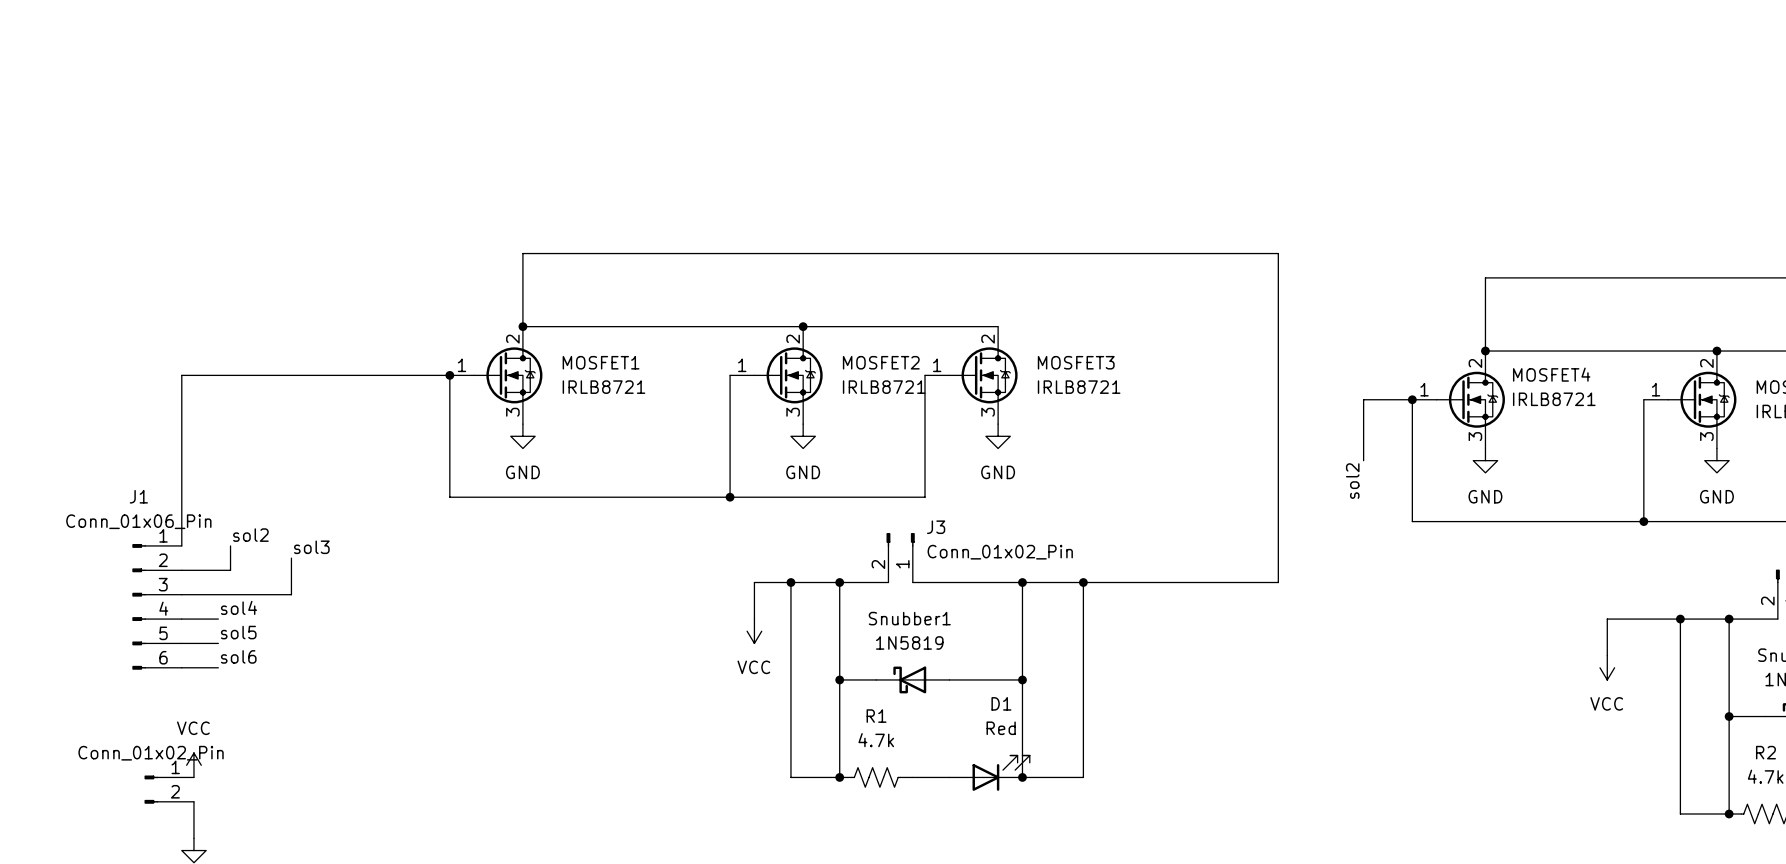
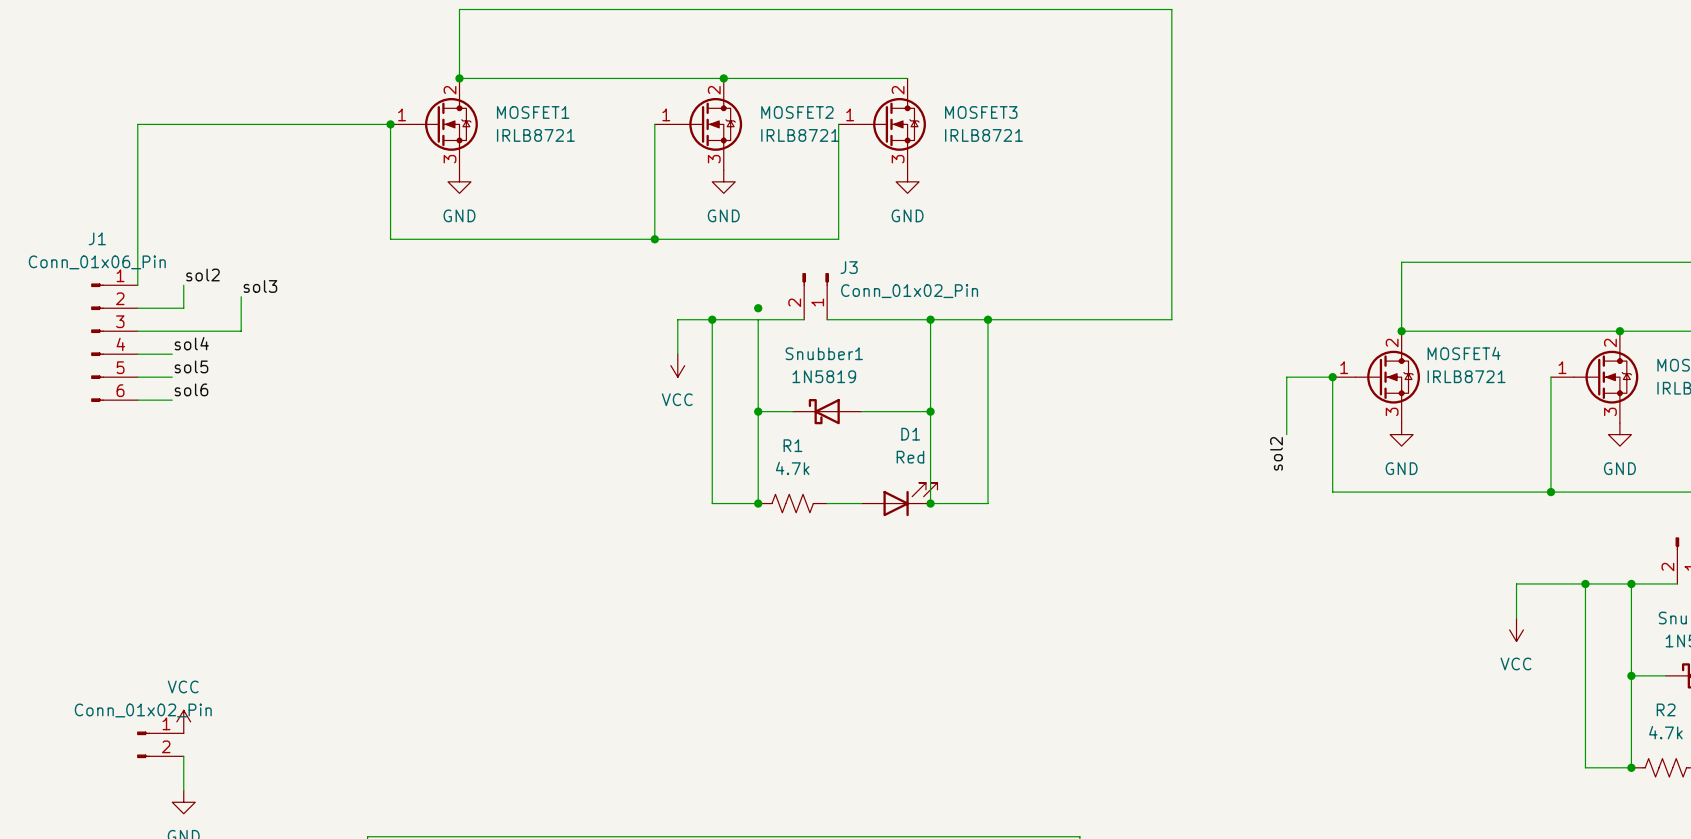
junction: none -> (459, 78)
junction: none -> (723, 78)
wire: none -> (907, 78) (459, 78) (459, 9) (1171, 9) (1171, 319) (827, 319)
junction: none -> (390, 124)
wire: none -> (654, 124) (654, 239)
power symbol: none -> GND (459, 181)
power symbol: none -> GND (723, 181)
power symbol: none -> GND (907, 181)
wire: (522, 253) (522, 326) (998, 326) -> (493, 239) (390, 239) (390, 124) (137, 124) (137, 285)
junction: none -> (654, 239)
wire: (888, 253) (1278, 253) (1278, 582) (912, 582) -> (838, 239) (838, 124)
label: none -> sol2 (202, 275)
wire: none -> (183, 285) (183, 308) (137, 308)
label: none -> sol3 (260, 286)
wire: none -> (241, 296) (241, 331) (137, 331)
junction: (522, 326) -> none
wire: none -> (712, 319) (712, 503) (758, 503) (758, 319)
junction: none -> (712, 319)
wire: none -> (804, 319) (677, 319) (677, 354)
wire: none -> (930, 319) (930, 503) (988, 503) (988, 319)
junction: none -> (930, 319)
junction: none -> (988, 319)
label: none -> sol4 (191, 343)
wire: none -> (137, 354) (172, 354)
junction: (449, 375) -> none
MOSFET1 position: (496, 375) -> (434, 124)
wire: (730, 375) (730, 497) -> none
MOSFET2 position: (776, 375) -> (698, 124)
wire: (925, 375) (925, 497) (449, 497) (449, 375) (181, 375) (181, 545) -> none
MOSFET3 position: (971, 375) -> (882, 124)
power symbol: none -> VCC (677, 365)
label: none -> sol5 (191, 366)
label: none -> sol6 (191, 389)
power symbol: GND (522, 436) -> none
wire: none -> (758, 411) (792, 411)
junction: none -> (758, 411)
power symbol: GND (803, 436) -> none
wire: none -> (861, 411) (930, 411)
junction: none -> (930, 411)
power symbol: GND (998, 436) -> none
junction: (730, 497) -> none
junction: none -> (758, 503)
junction: none -> (930, 503)
label: sol2 (250, 535) -> none
wire: (230, 545) (230, 570) (181, 570) -> none
label: sol3 (311, 547) -> none
J3 position: (900, 557) -> (815, 296)
wire: (291, 558) (291, 594) (181, 594) -> none
wire: (790, 582) (790, 777) (839, 777) (839, 582) -> none
junction: (790, 582) -> none
junction: (839, 582) -> none
wire: (888, 582) (754, 582) (754, 619) -> none
wire: (1022, 582) (1022, 777) (1083, 777) (1083, 582) -> none
junction: (1022, 582) -> none
junction: (1083, 582) -> none
J1 position: (157, 606) -> (114, 342)
label: sol4 (239, 607) -> none
wire: (181, 619) (218, 619) -> (137, 377) (172, 377)
power symbol: VCC (754, 631) -> none
label: sol5 (238, 632) -> none
wire: (181, 643) (218, 643) -> (137, 400) (172, 400)
label: sol6 (238, 656) -> none
wire: (181, 667) (218, 667) -> none
wire: (839, 679) (876, 679) -> (827, 503) (861, 503)
junction: (839, 679) -> none
Snubber1 position: (912, 679) -> (827, 411)
wire: (949, 679) (1022, 679) -> none
junction: (1022, 679) -> none
D1 position: (989, 773) -> (899, 499)
junction: (839, 777) -> none
R1 position: (876, 777) -> (792, 503)
wire: (912, 777) (949, 777) -> none
junction: (1022, 777) -> none

